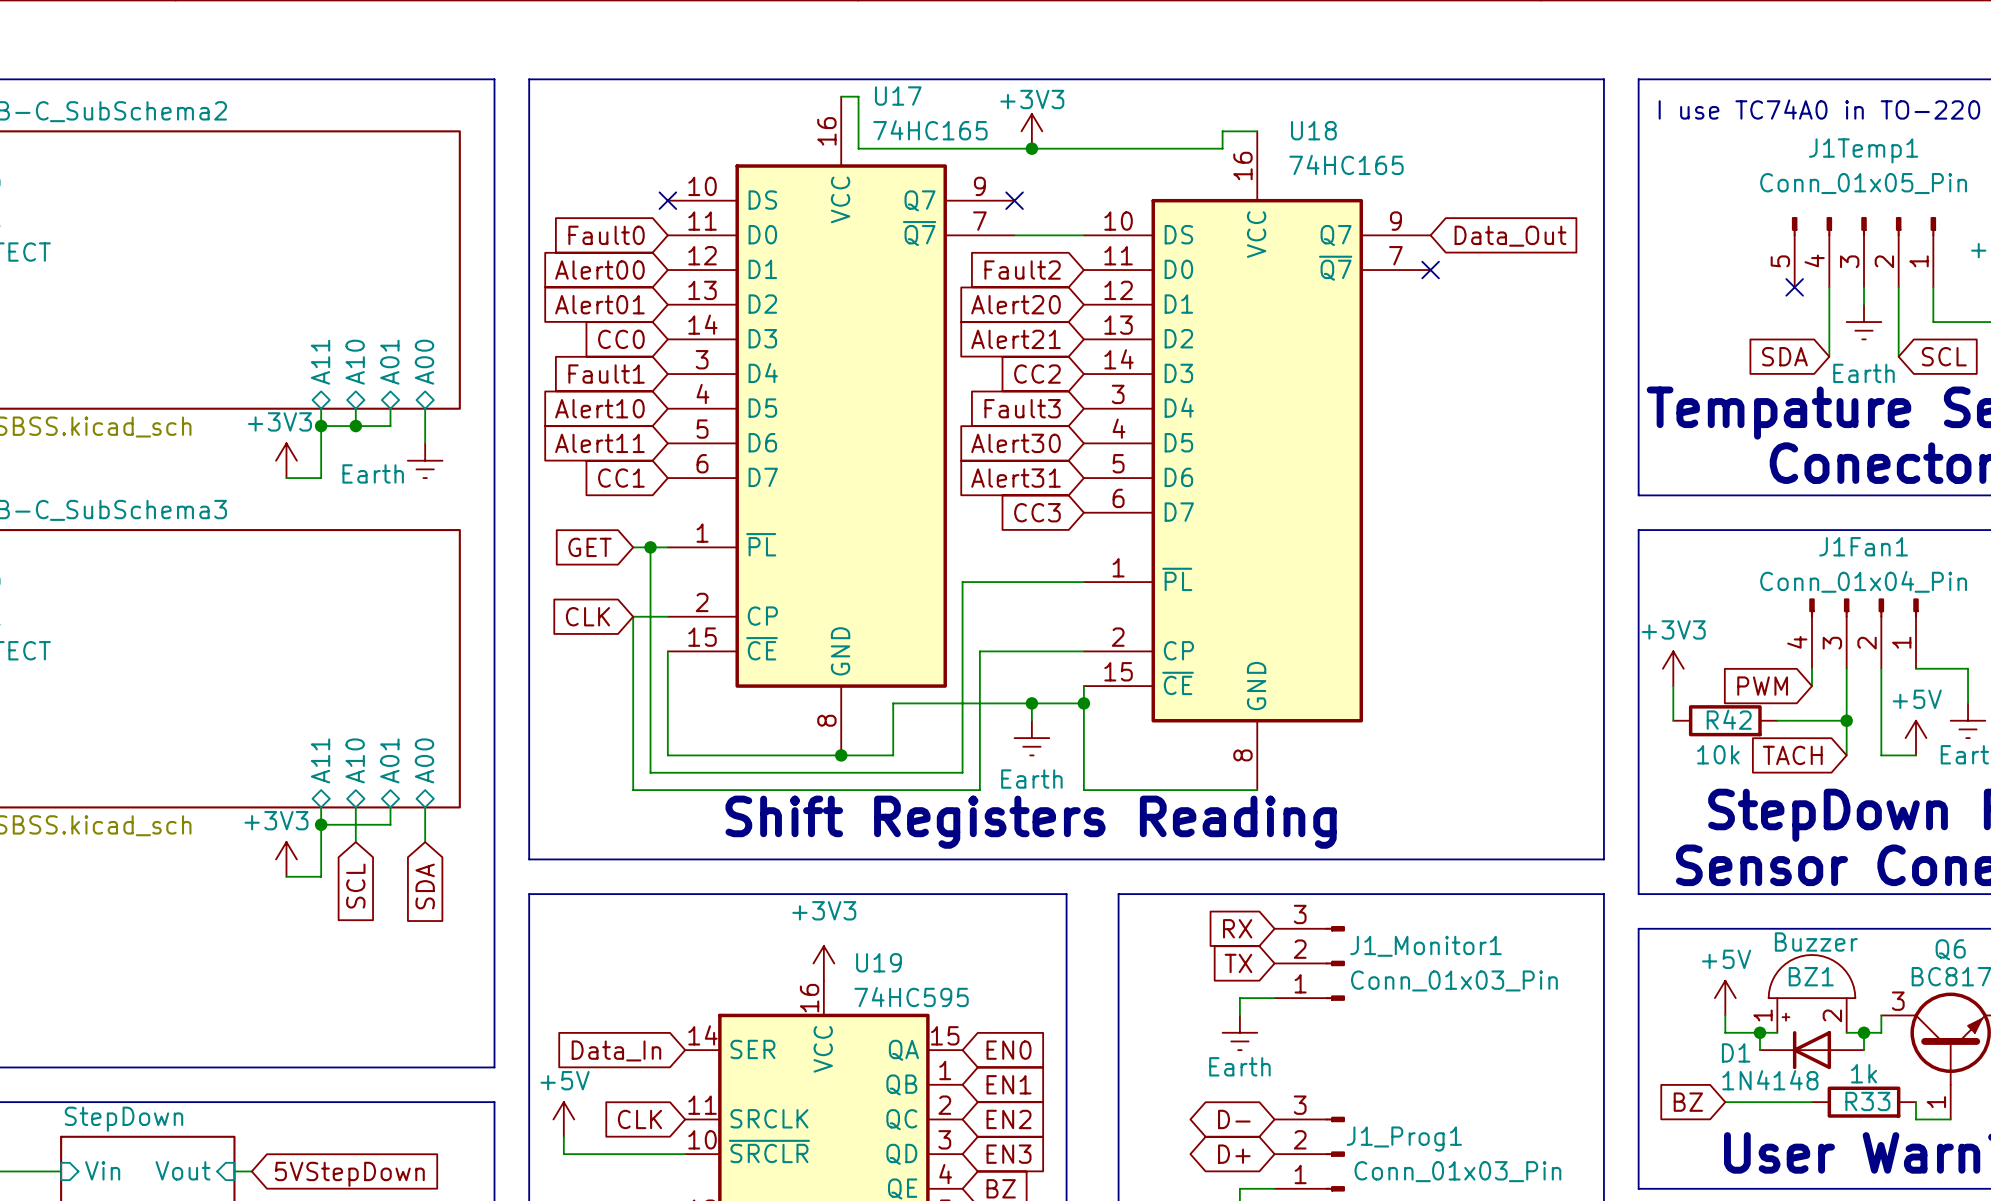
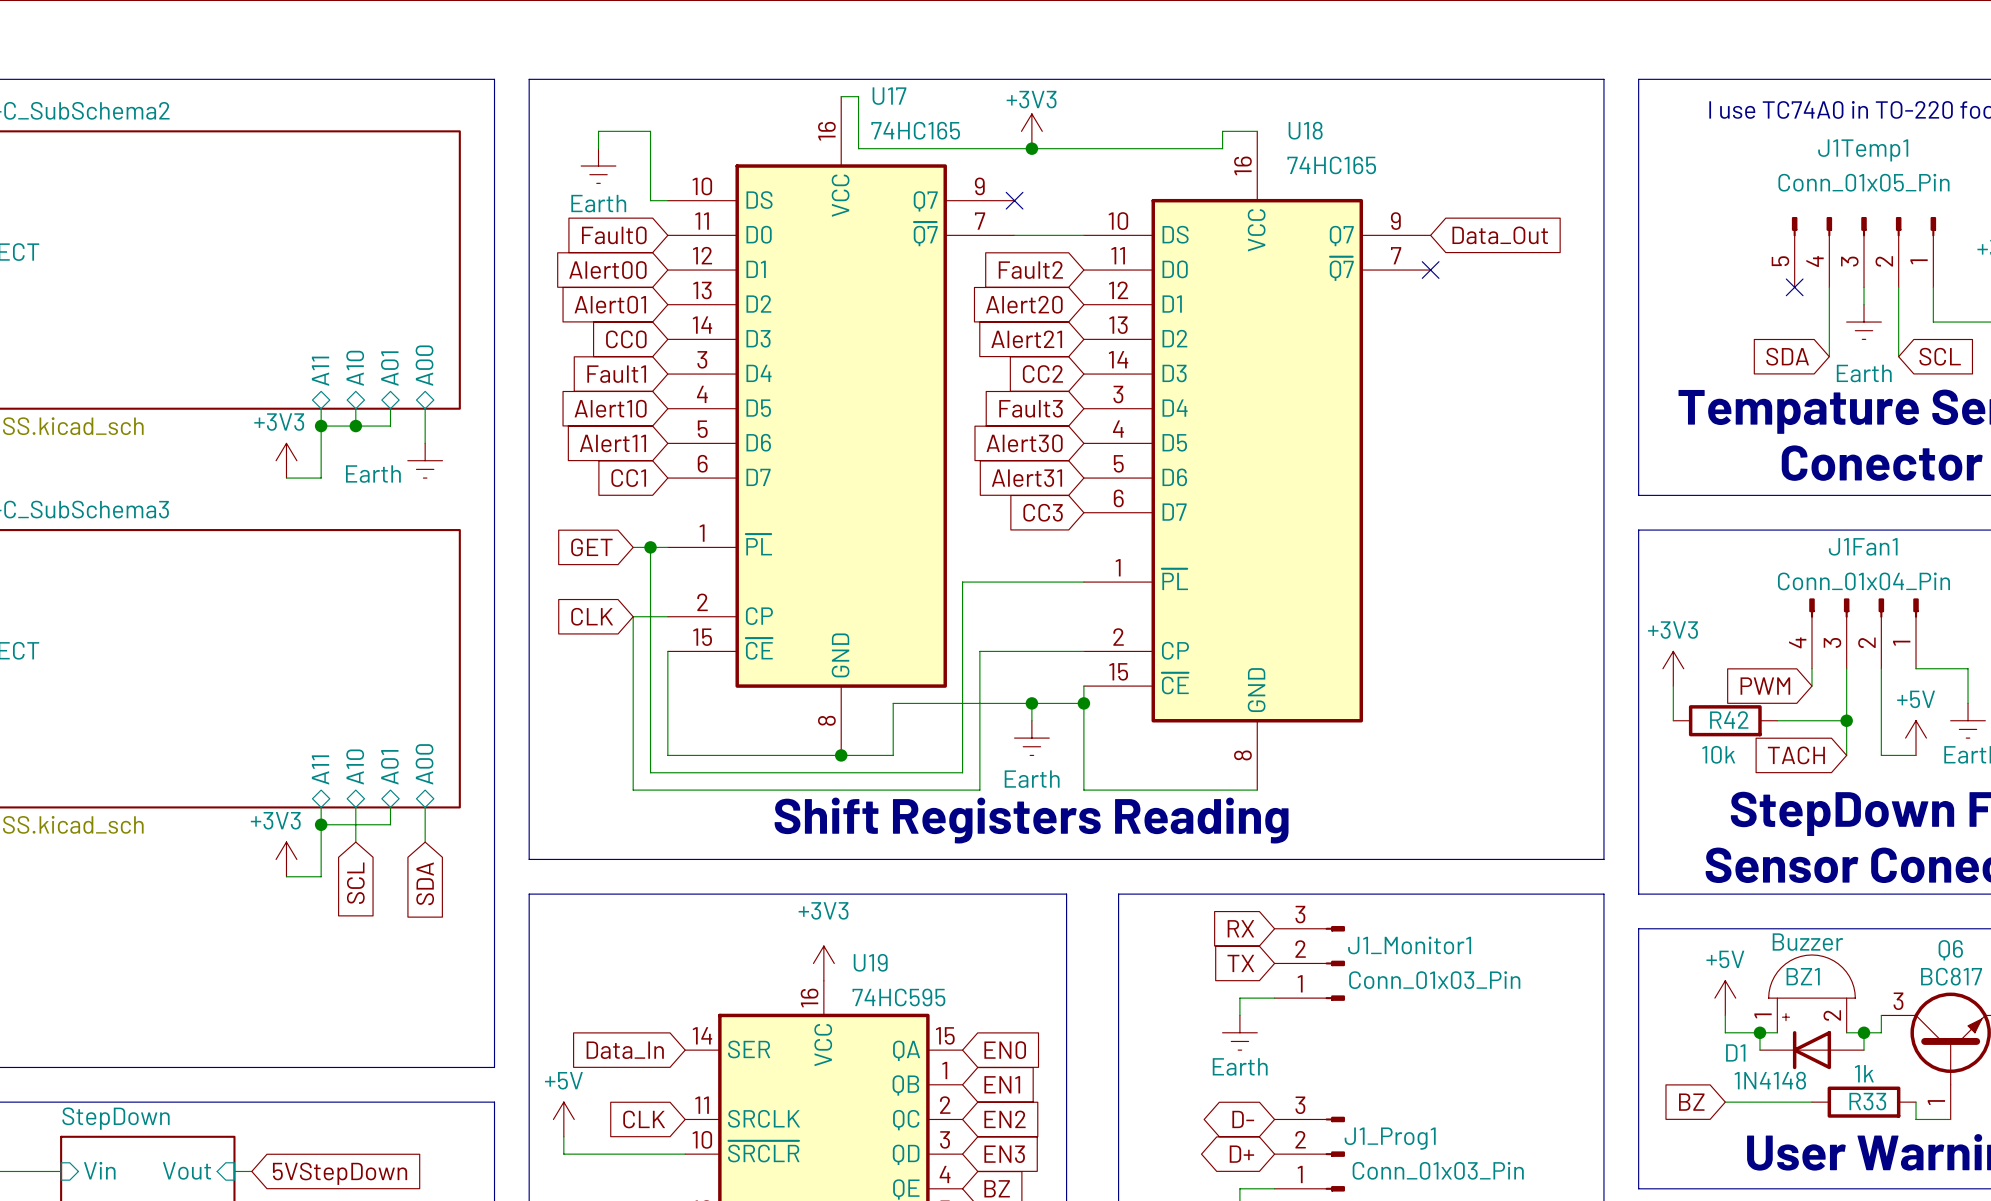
wire: none -> (598, 148) (598, 131) (650, 131) (650, 200) (667, 200)
power symbol: none -> Earth (598, 166)
no-connect mark: (667, 200) -> none

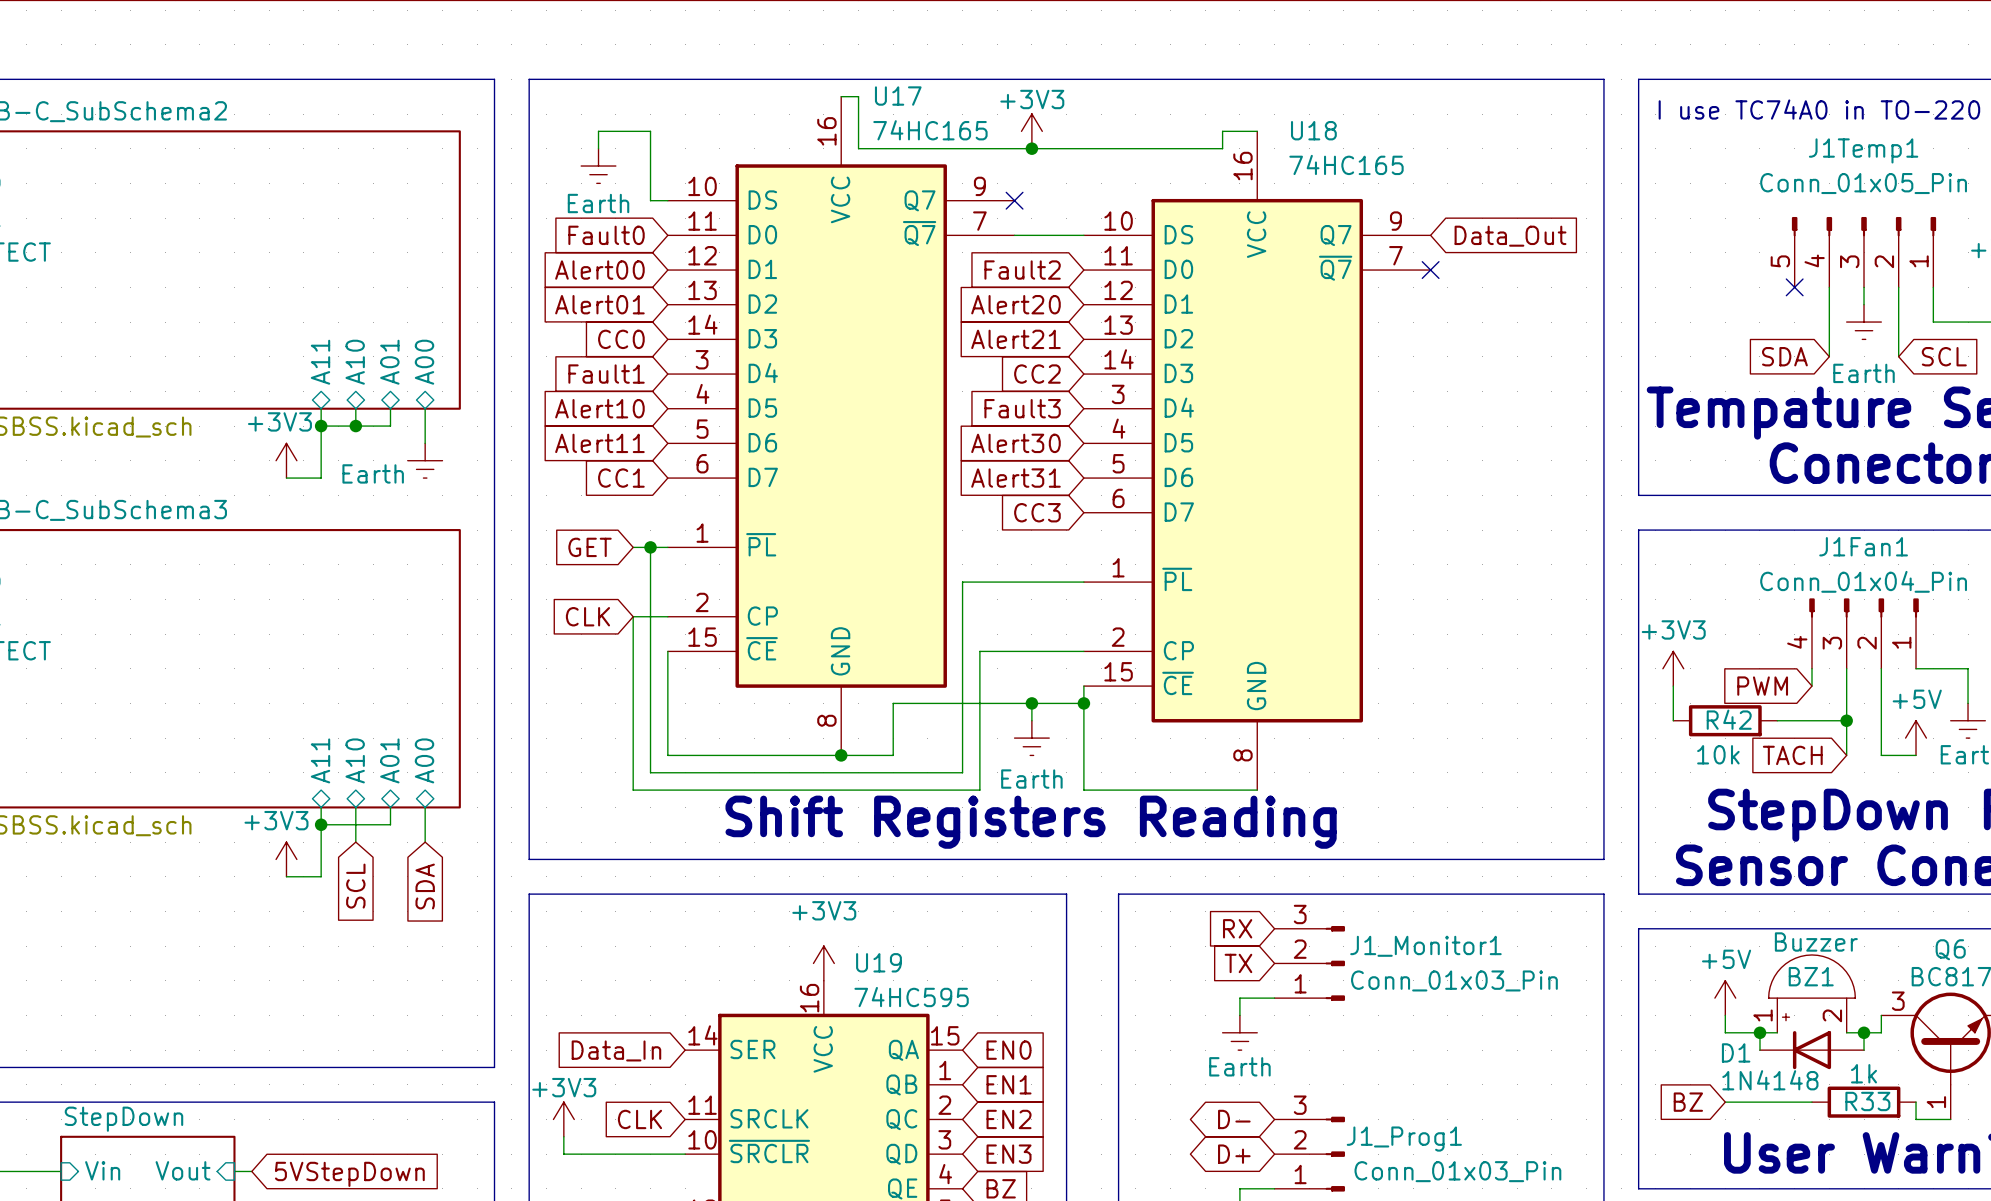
power symbol: +5V (563, 1119) -> +3V3 (563, 1119)

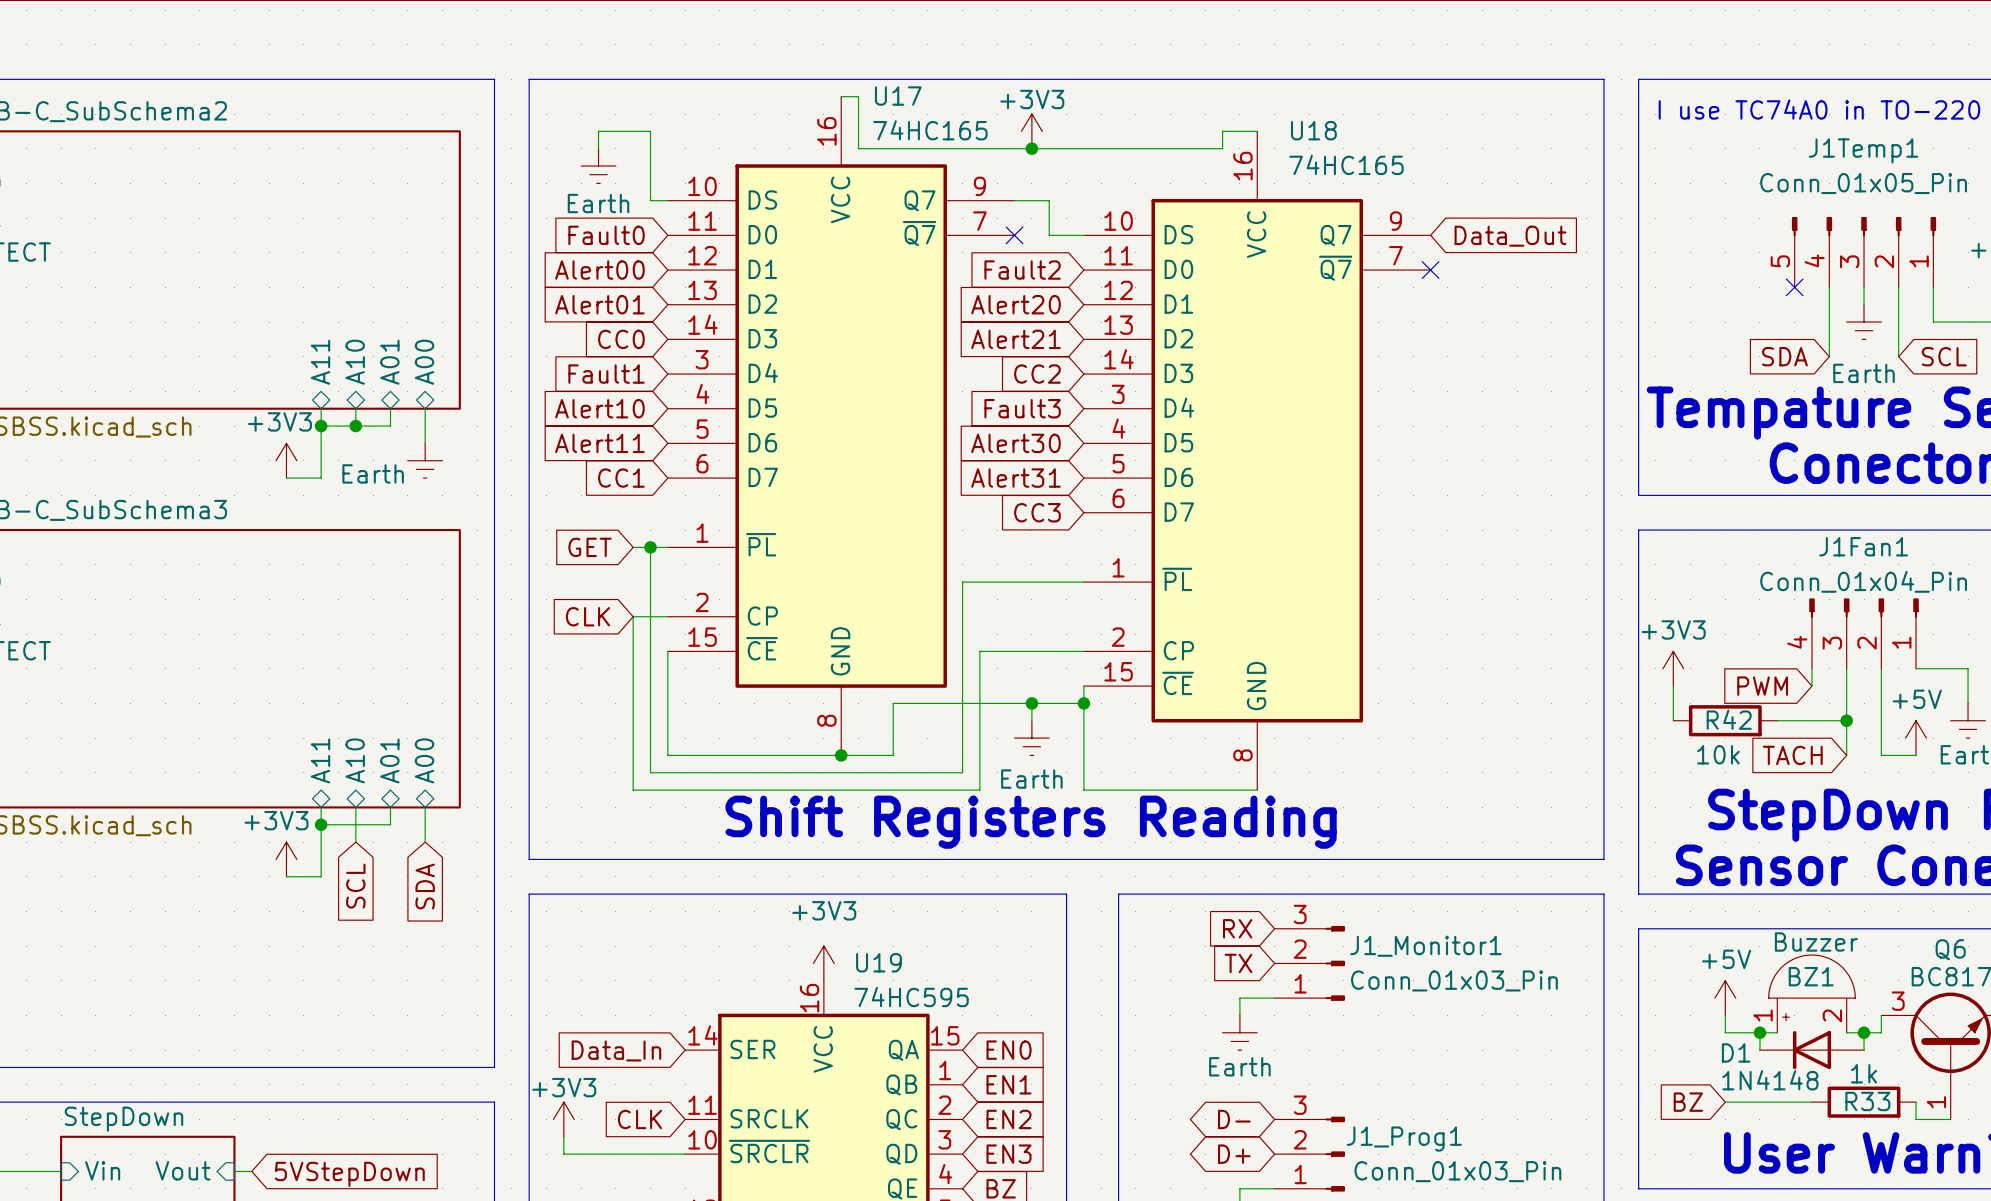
no-connect mark position: (1014, 200) -> (1014, 235)
wire: (1014, 235) (1049, 235) -> (1014, 200) (1049, 200) (1049, 235)

